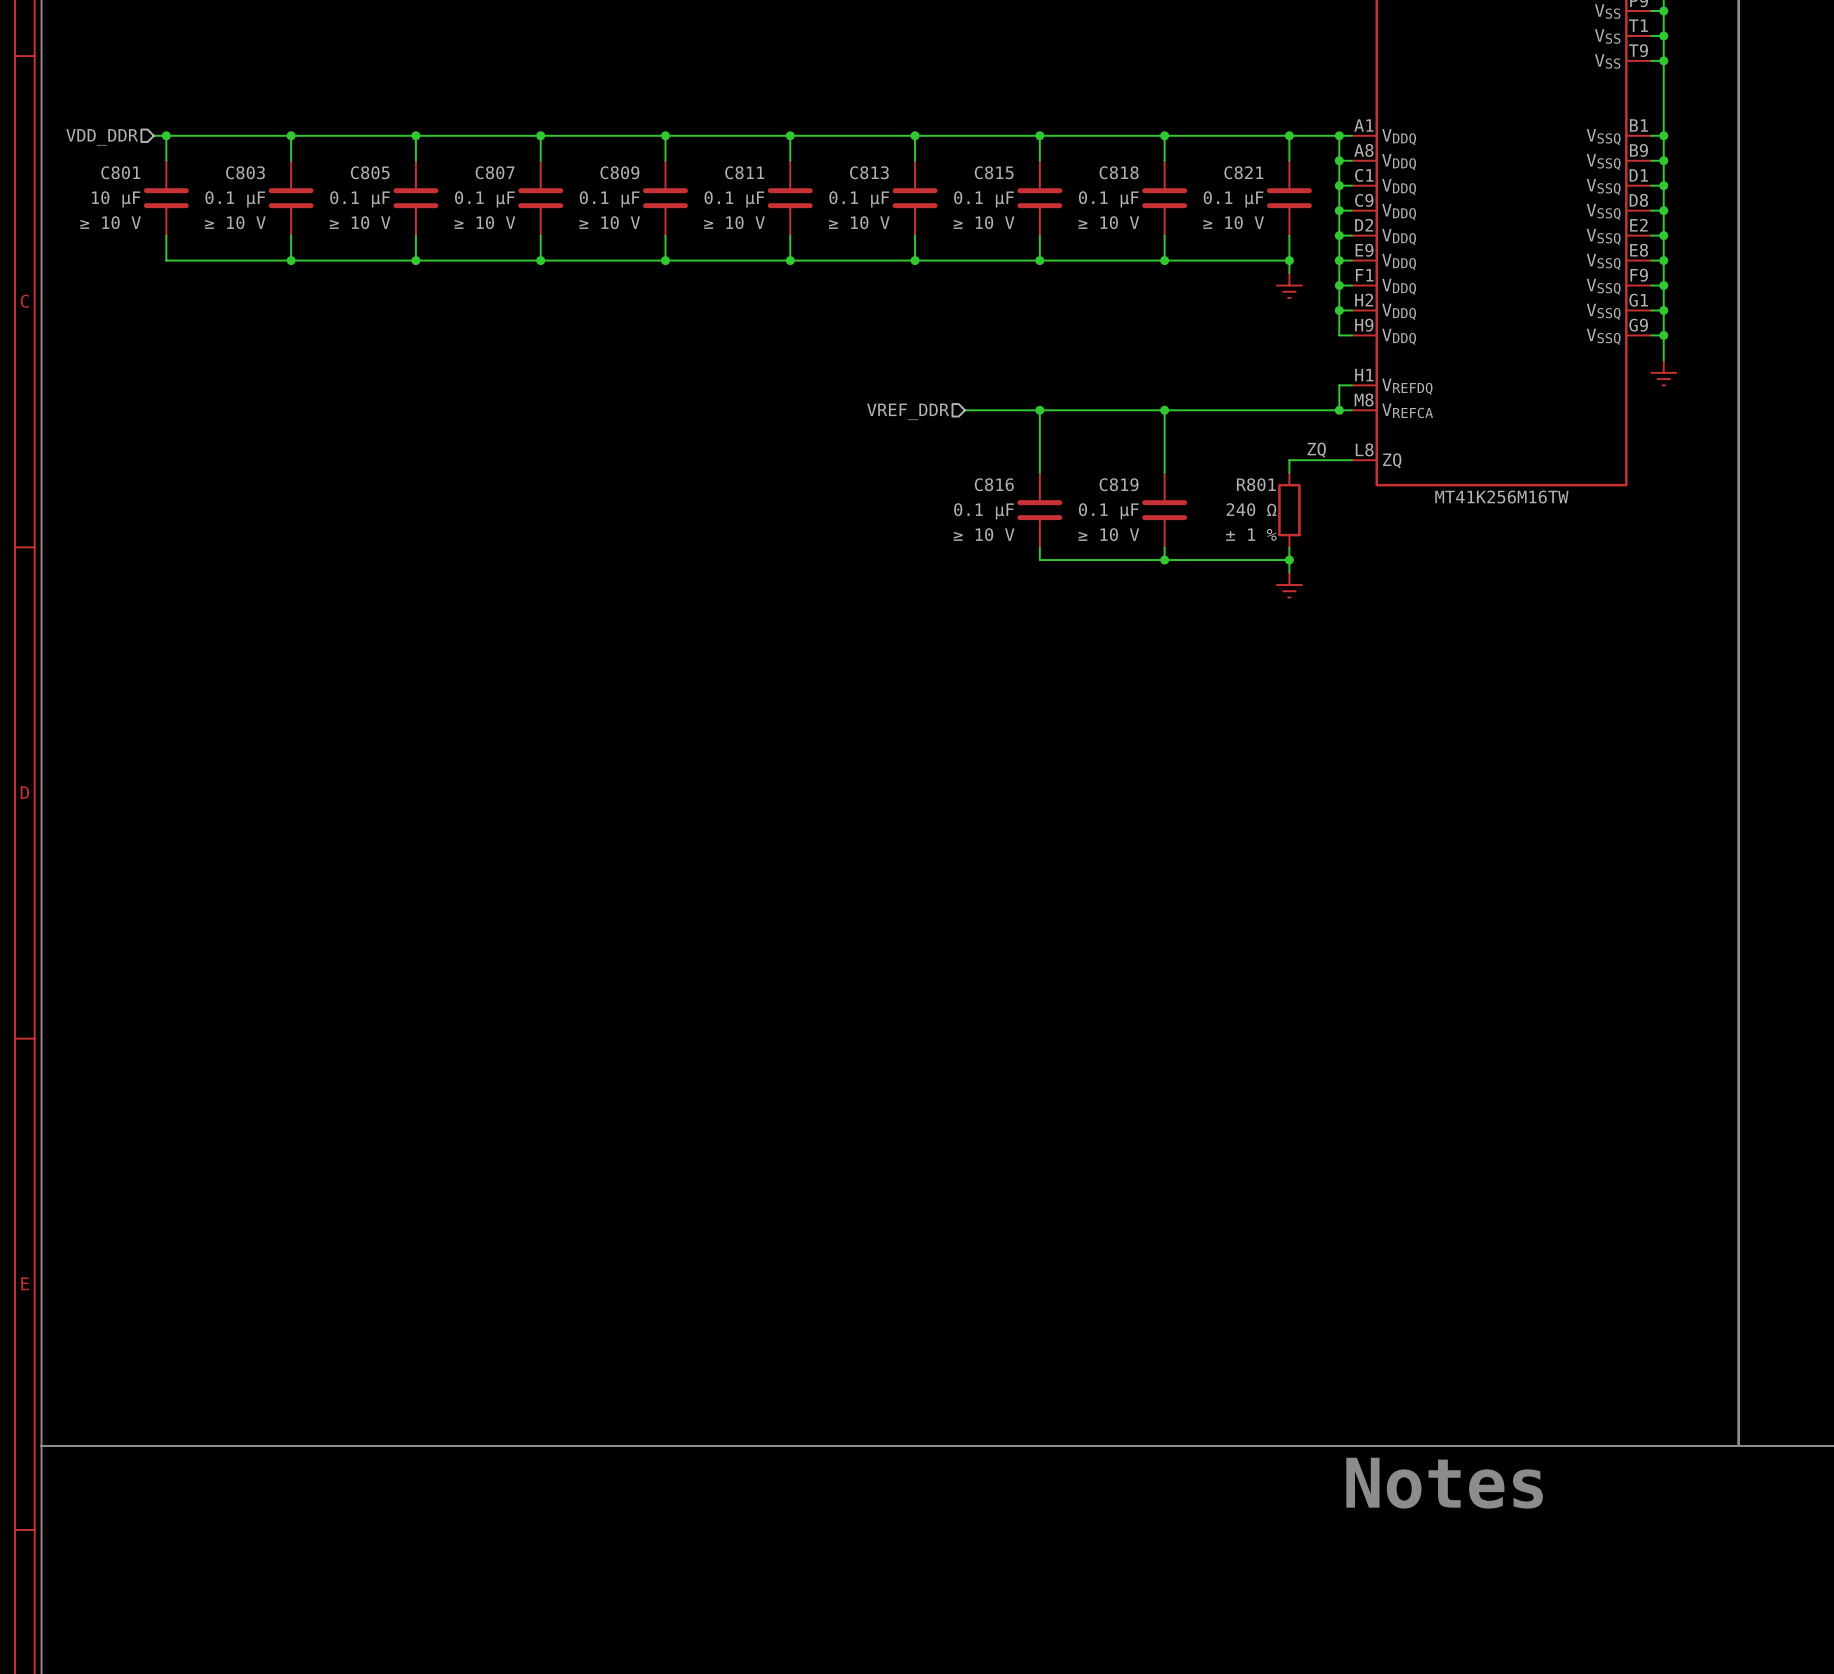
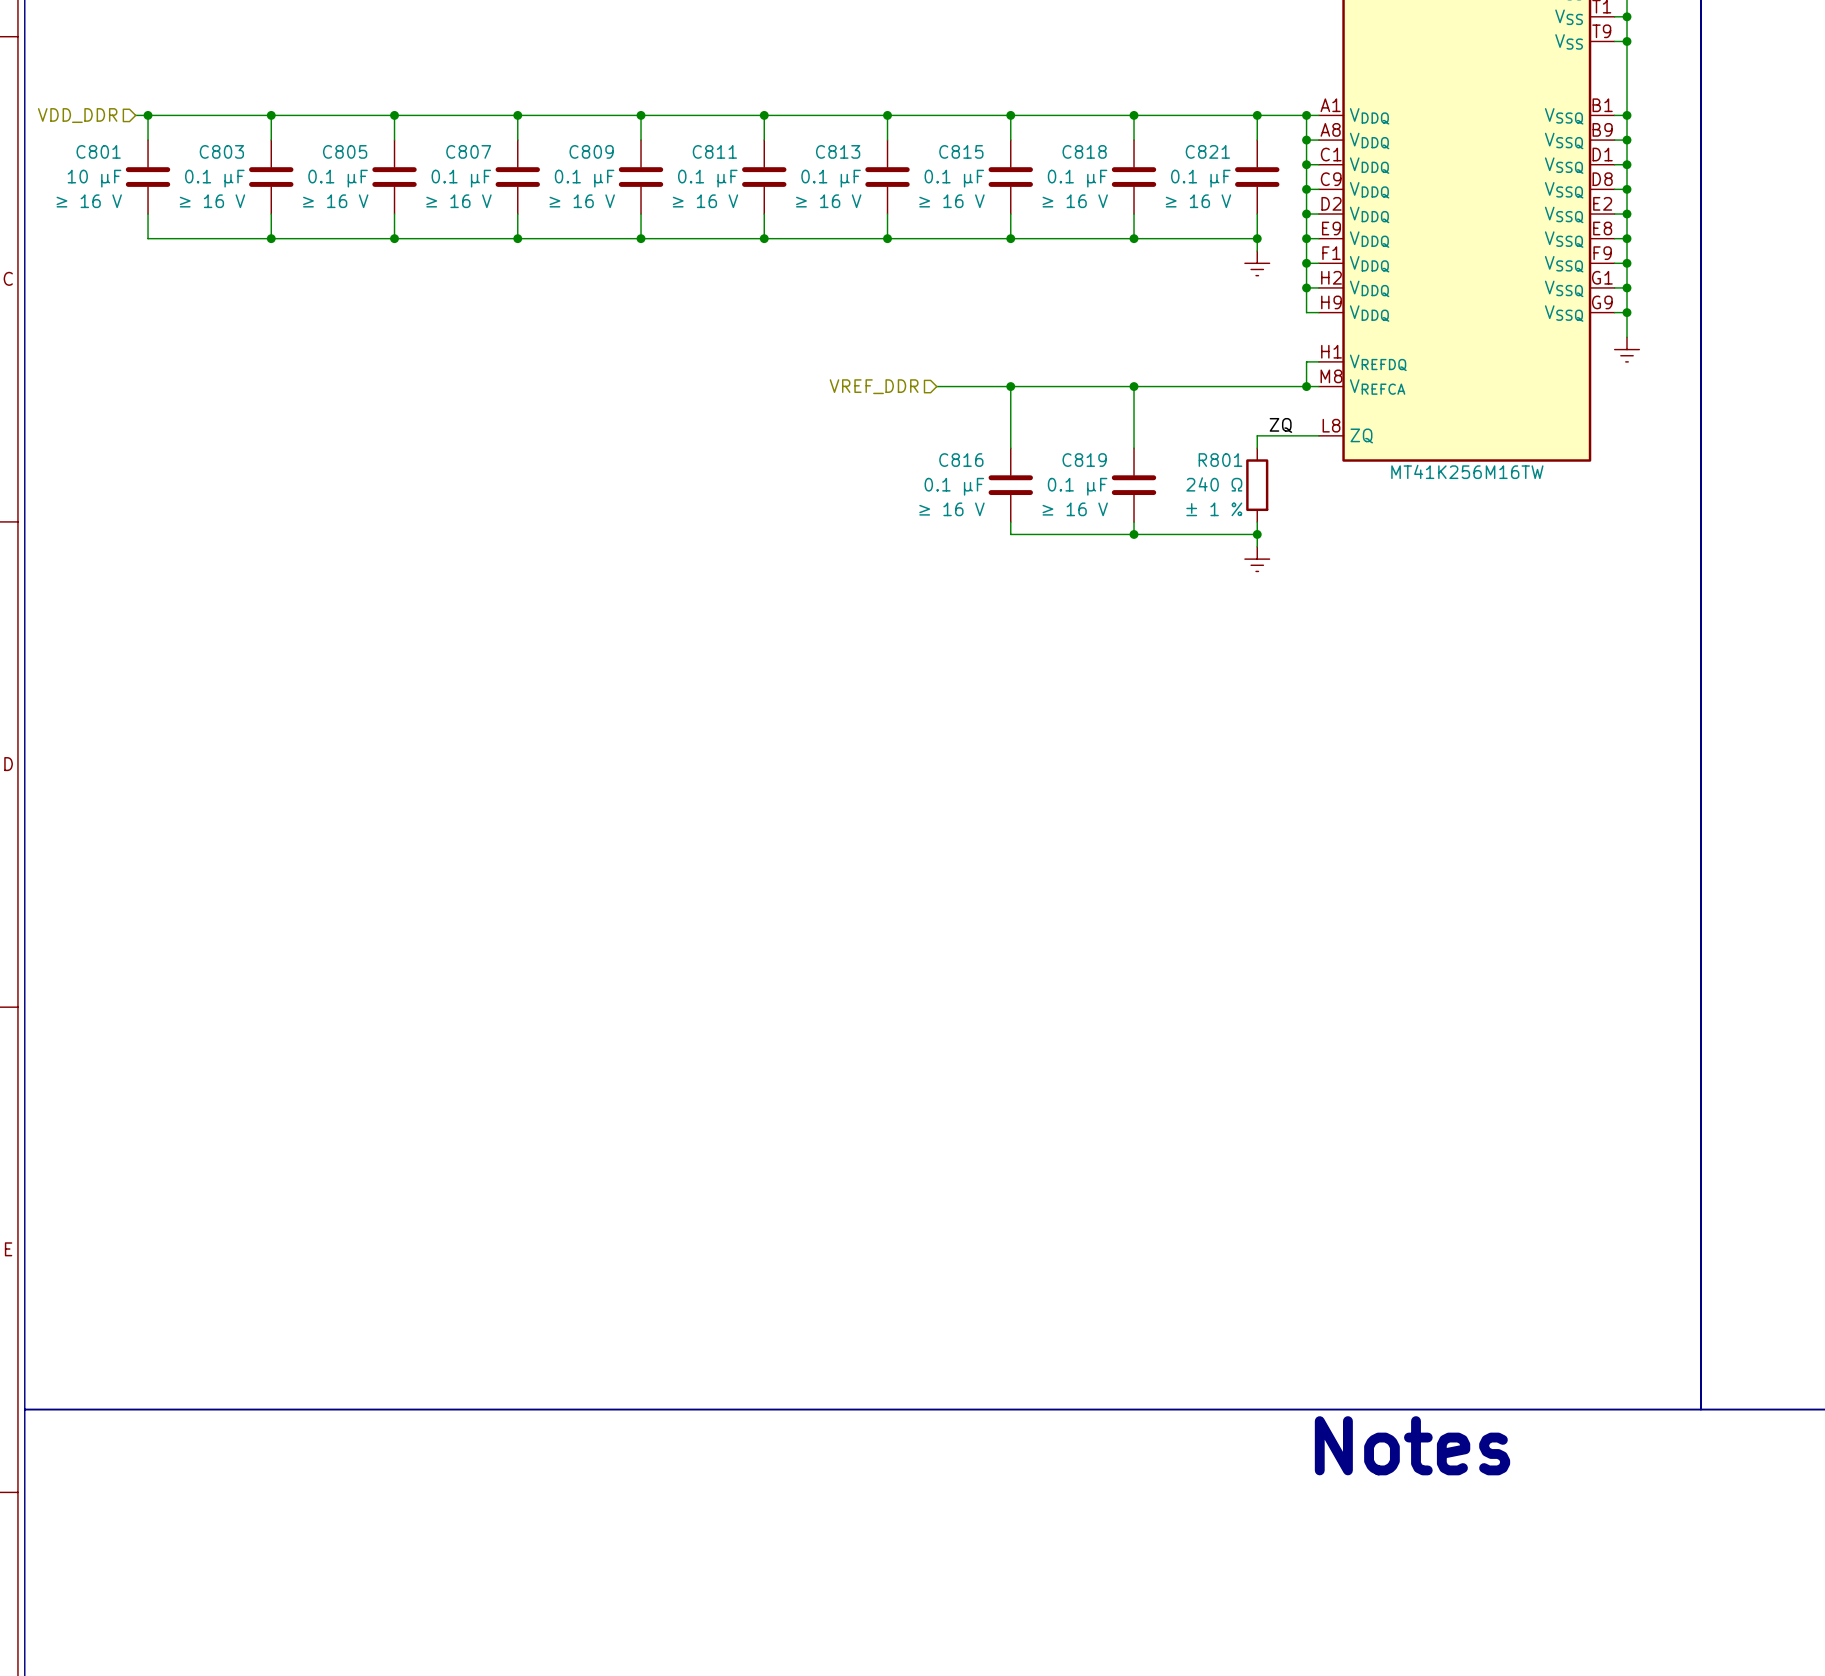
C801 text: ≥ 10 V (110, 222) -> ≥ 16 V (89, 201)
C803 text: ≥ 10 V (235, 222) -> ≥ 16 V (212, 201)
C805 text: ≥ 10 V (360, 222) -> ≥ 16 V (335, 201)
C807 text: ≥ 10 V (484, 222) -> ≥ 16 V (458, 201)
C809 text: ≥ 10 V (609, 222) -> ≥ 16 V (582, 201)
C811 text: ≥ 10 V (734, 222) -> ≥ 16 V (705, 201)
C813 text: ≥ 10 V (859, 222) -> ≥ 16 V (828, 201)
C815 text: ≥ 10 V (984, 222) -> ≥ 16 V (951, 201)
C818 text: ≥ 10 V (1108, 222) -> ≥ 16 V (1075, 201)
C821 text: ≥ 10 V (1233, 222) -> ≥ 16 V (1198, 201)
C816 text: ≥ 10 V (984, 534) -> ≥ 16 V (951, 509)
C819 text: ≥ 10 V (1108, 534) -> ≥ 16 V (1075, 509)

